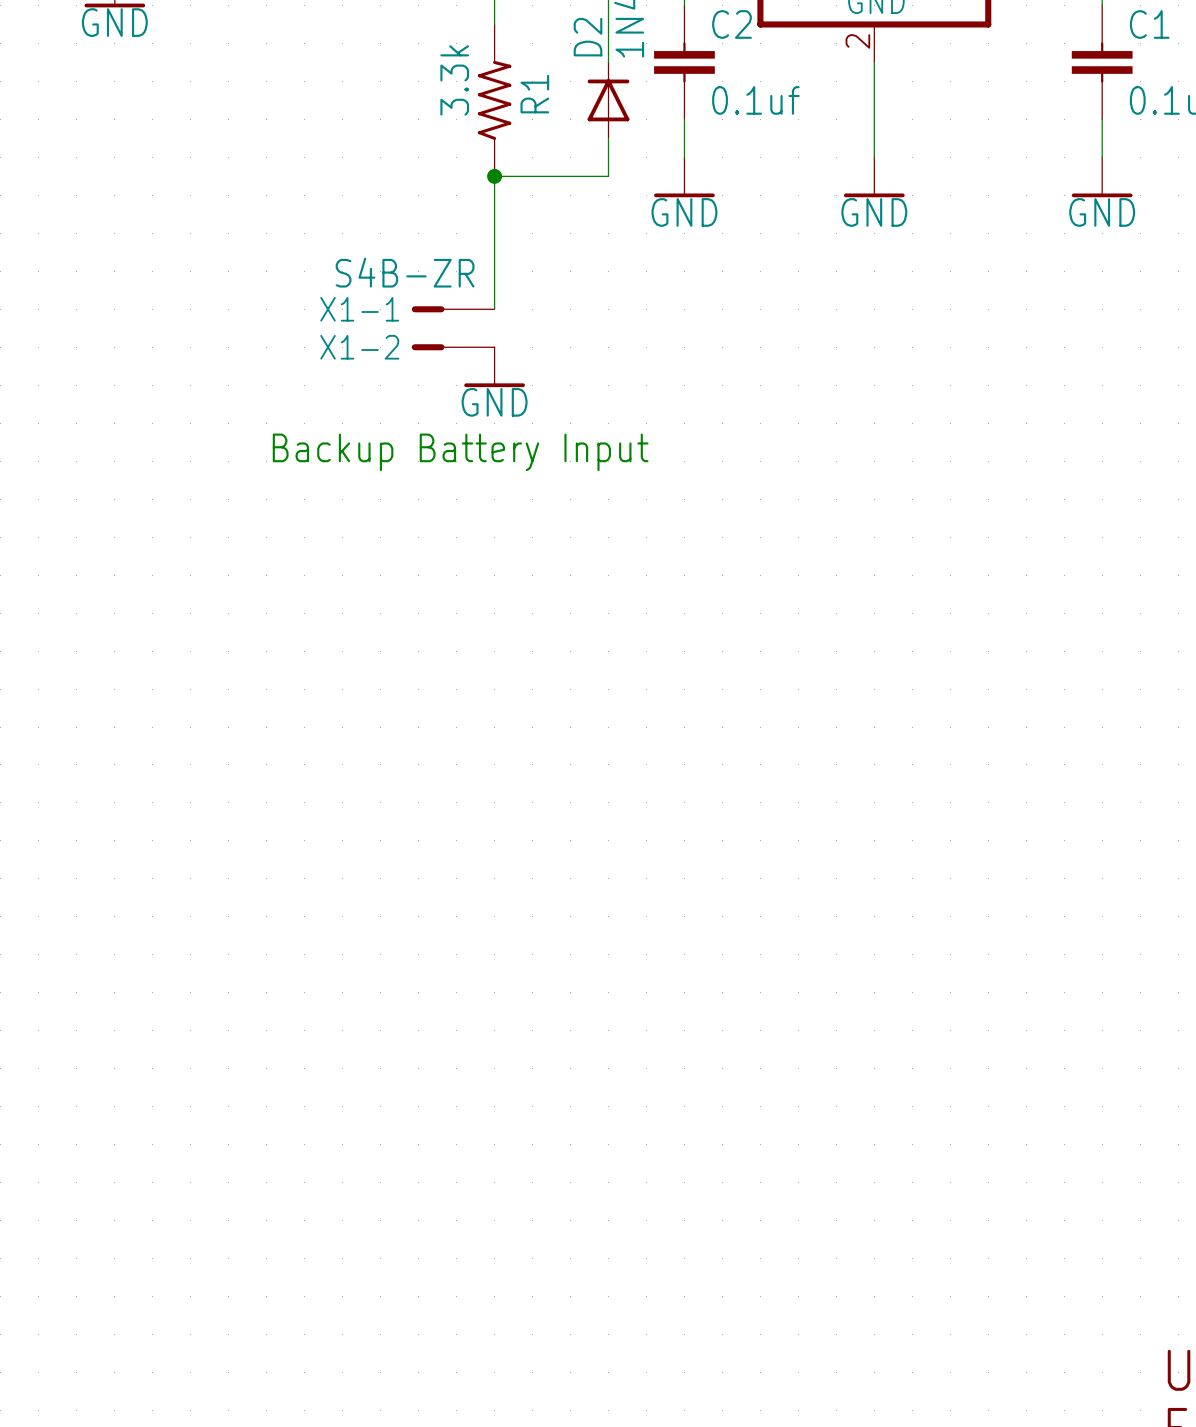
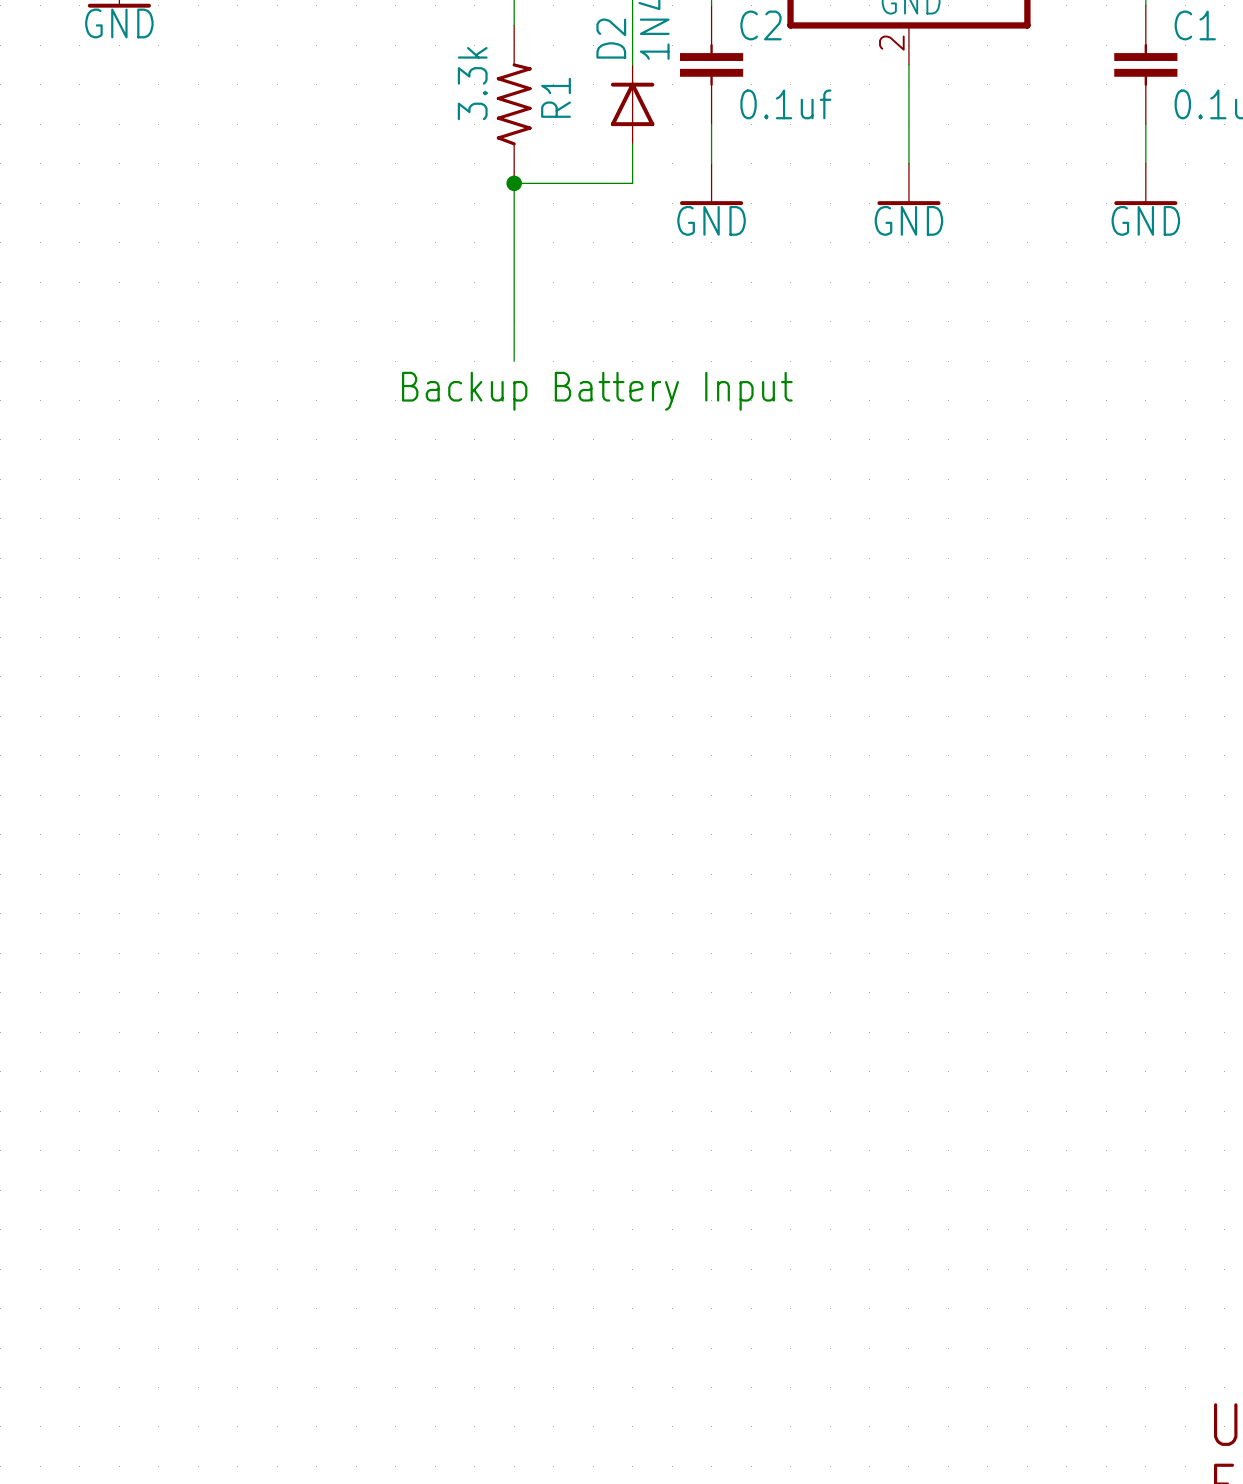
X1-1: S4B-ZR (453, 309) -> none
wire: none -> (514, 321) (514, 361)
X1-2: (453, 347) -> none
power symbol: GND (494, 367) -> none
text position: Backup Battery Input (460, 452) -> Backup Battery Input (597, 391)

